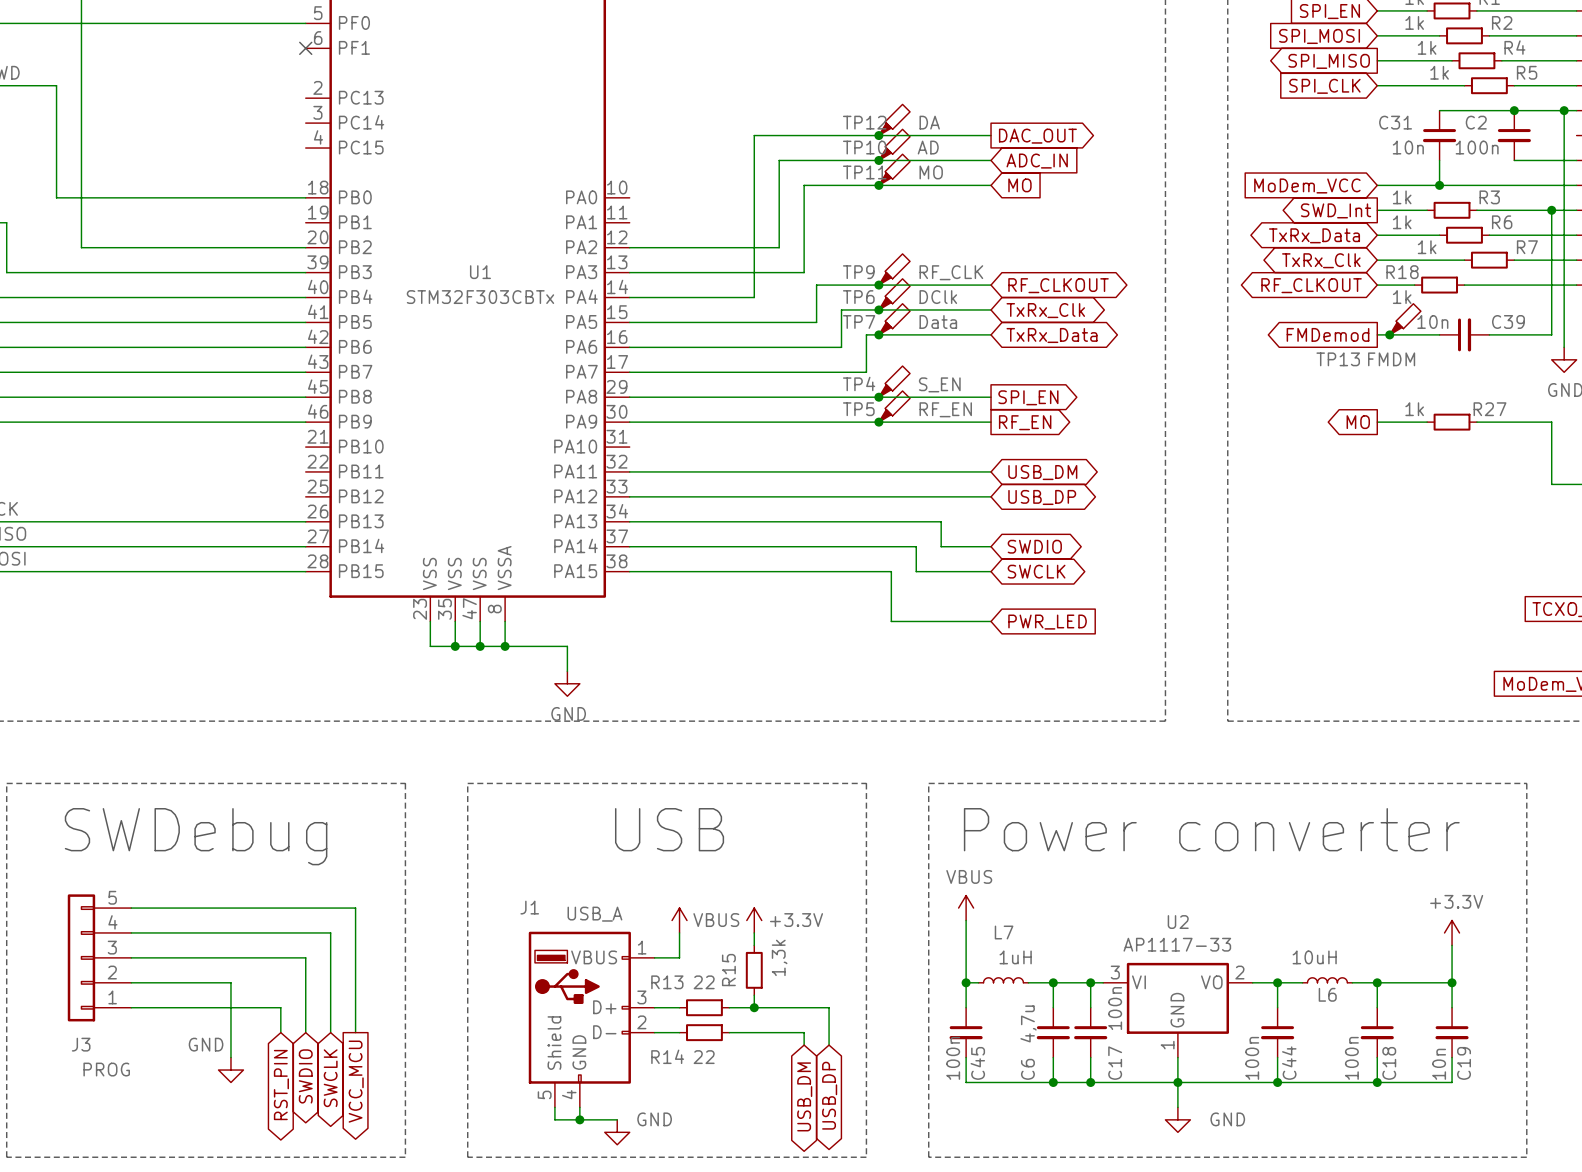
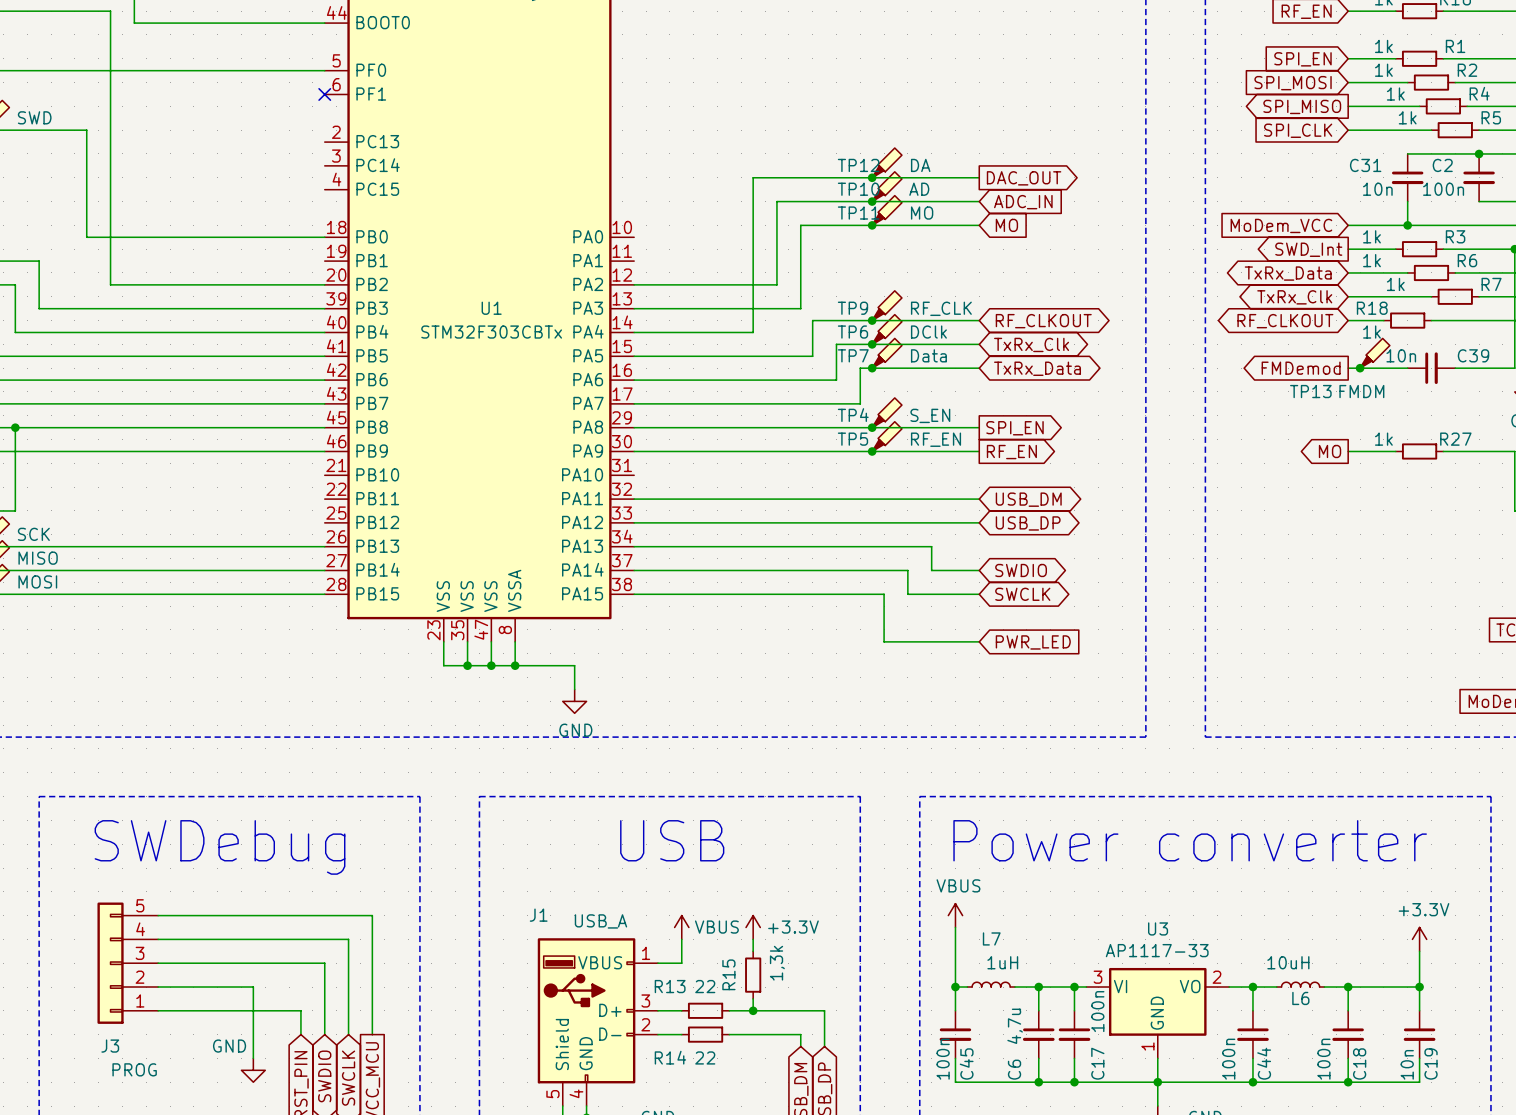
U2 name: U2 (1178, 922) -> U3 (1158, 928)

